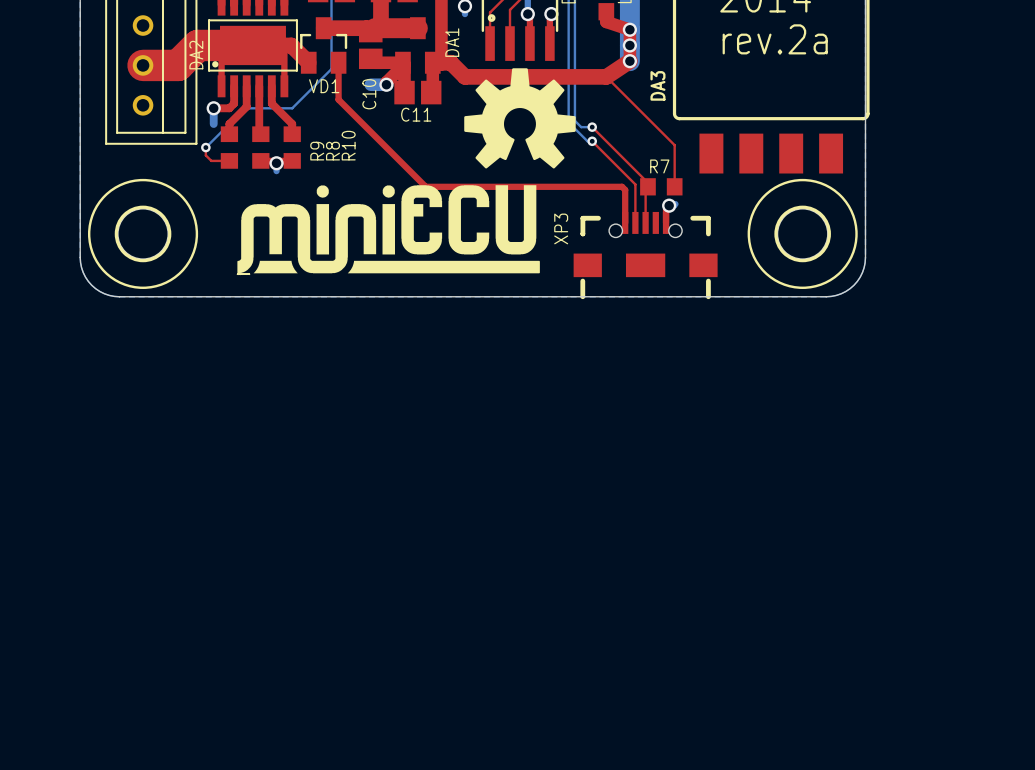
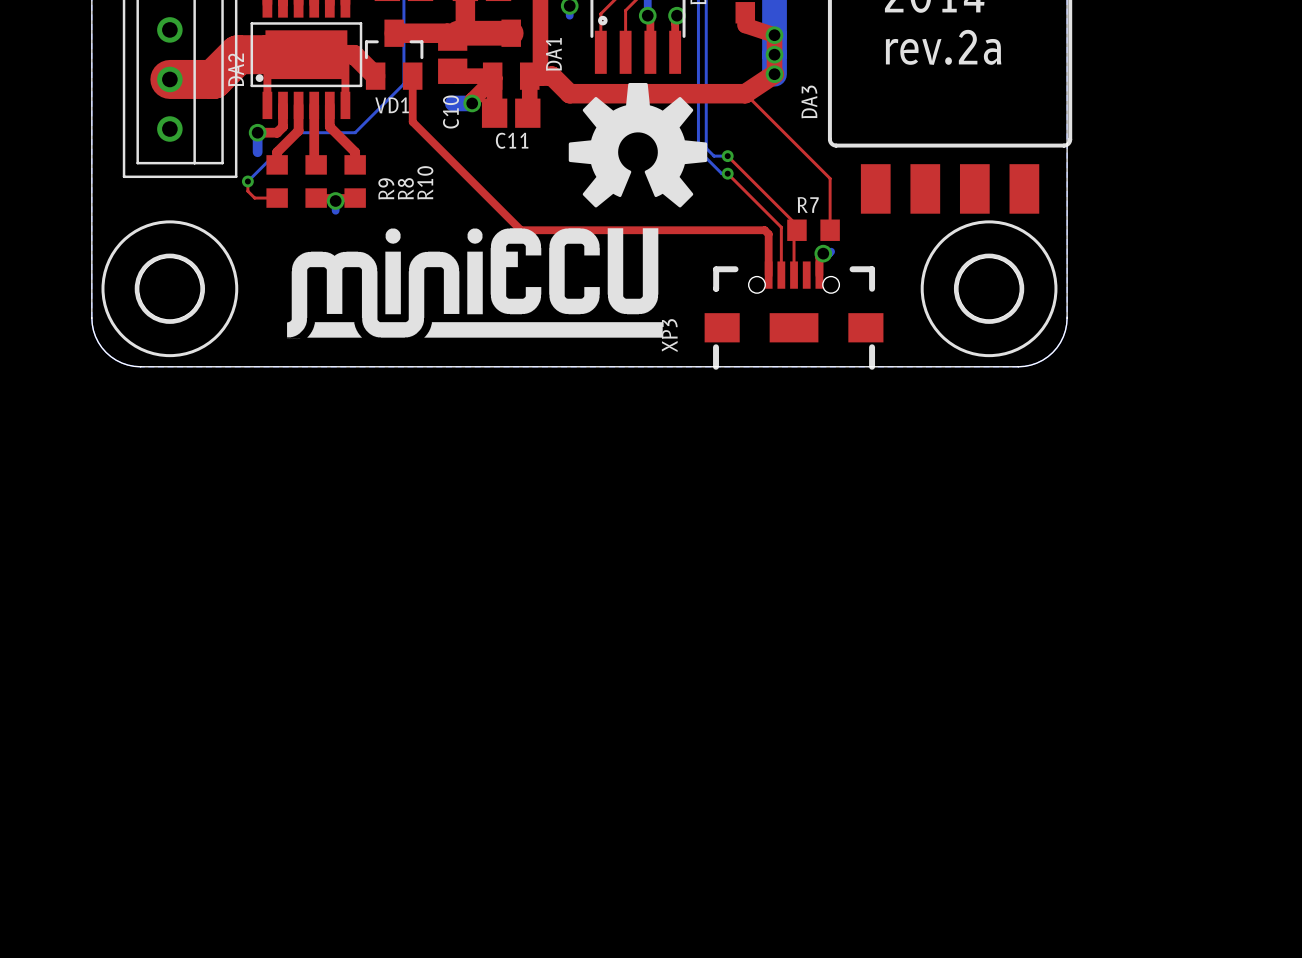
XP3 name position: XP3 (561, 228) -> XP3 (669, 335)

